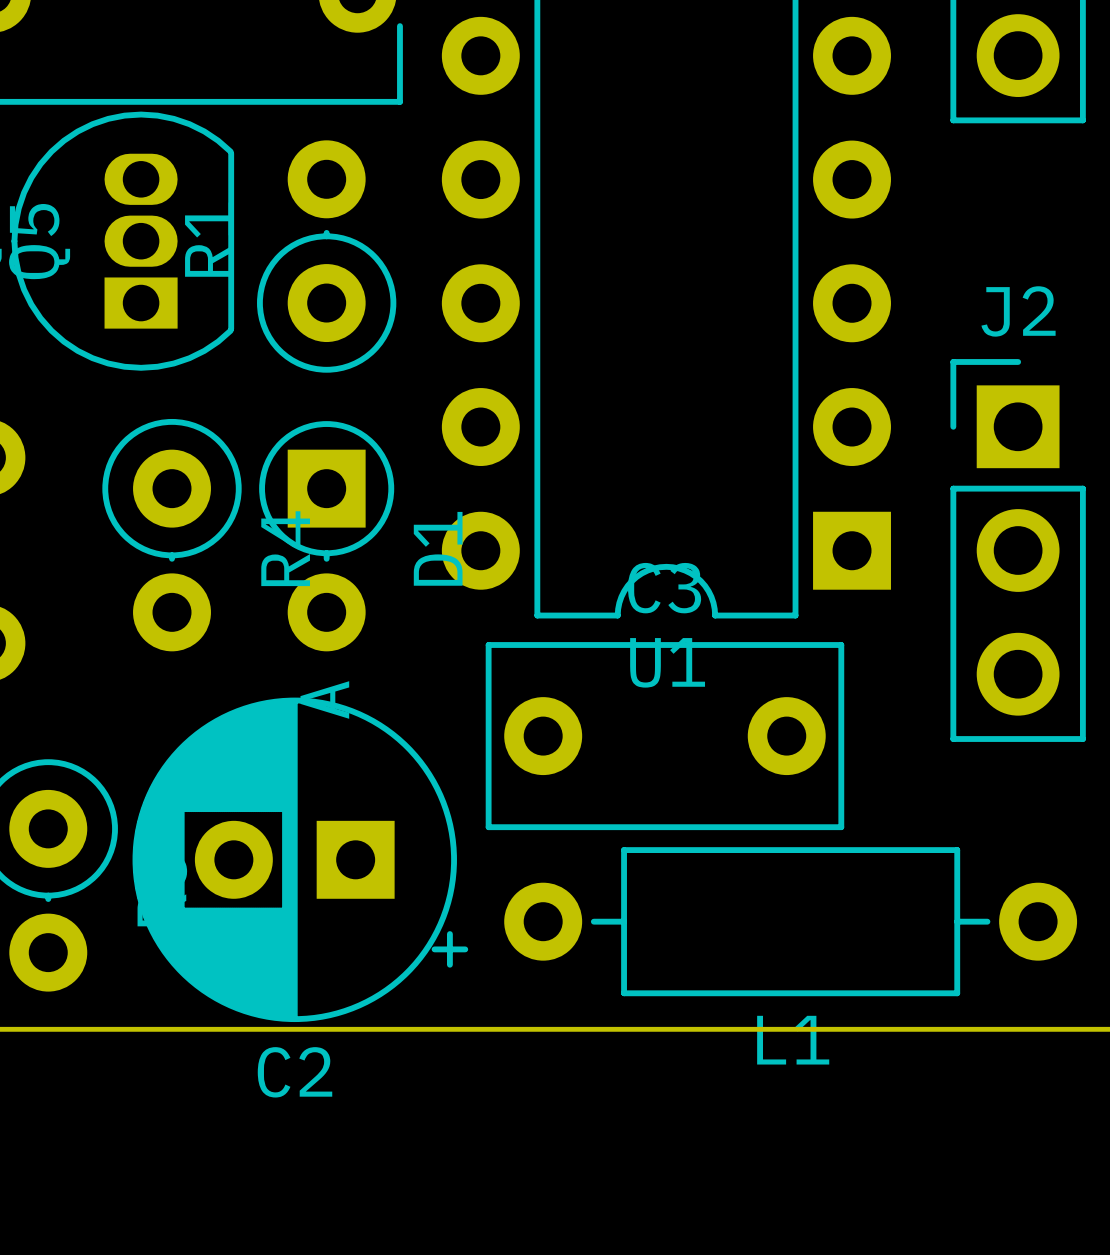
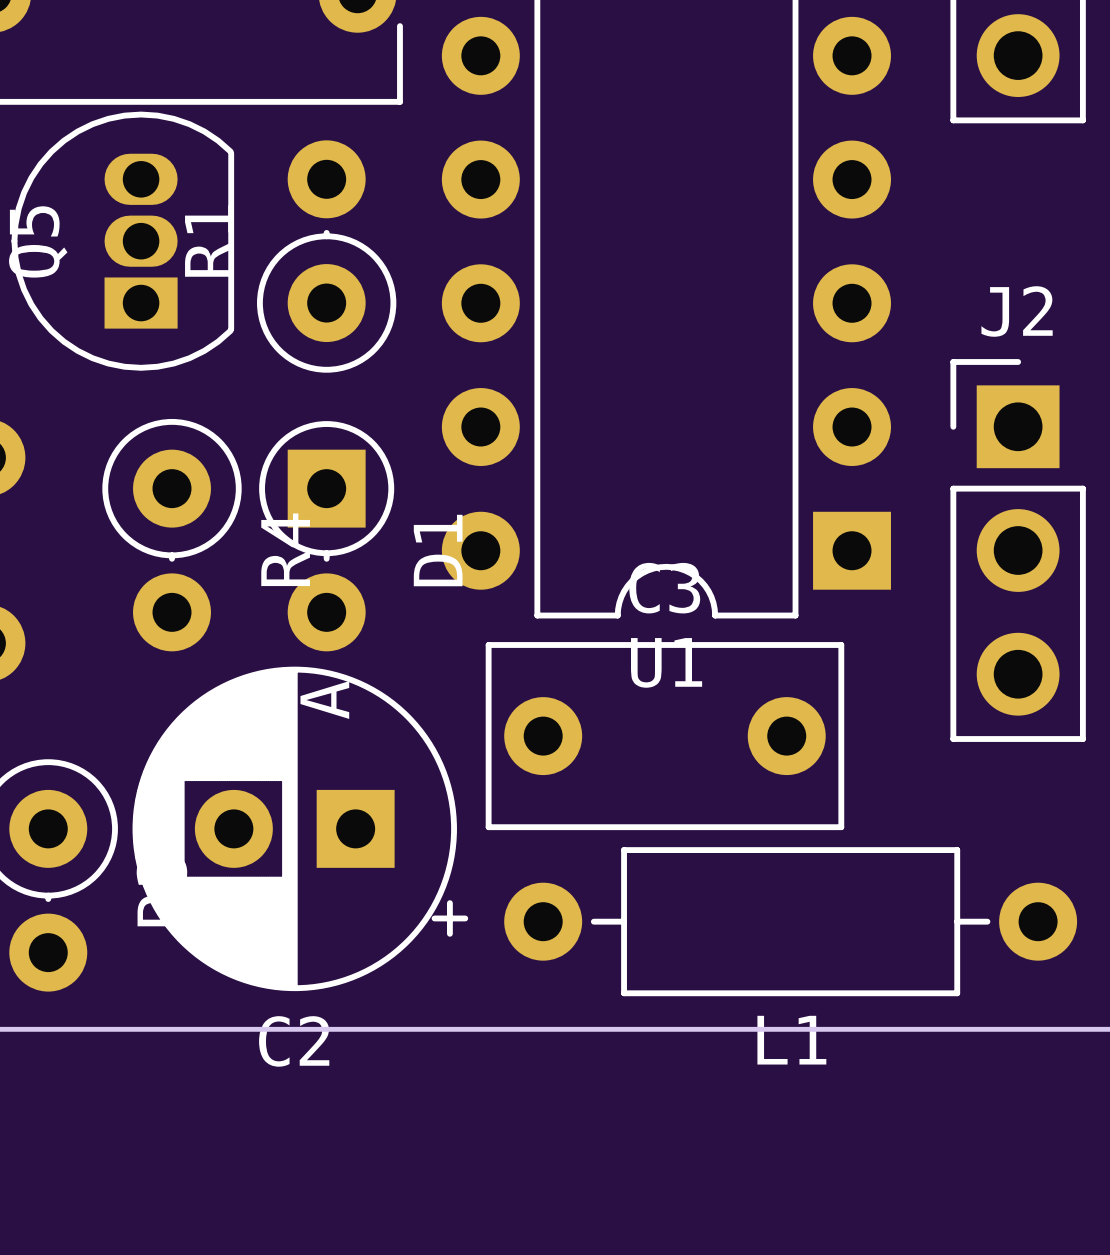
C2 position: (300, 859) -> (300, 828)

